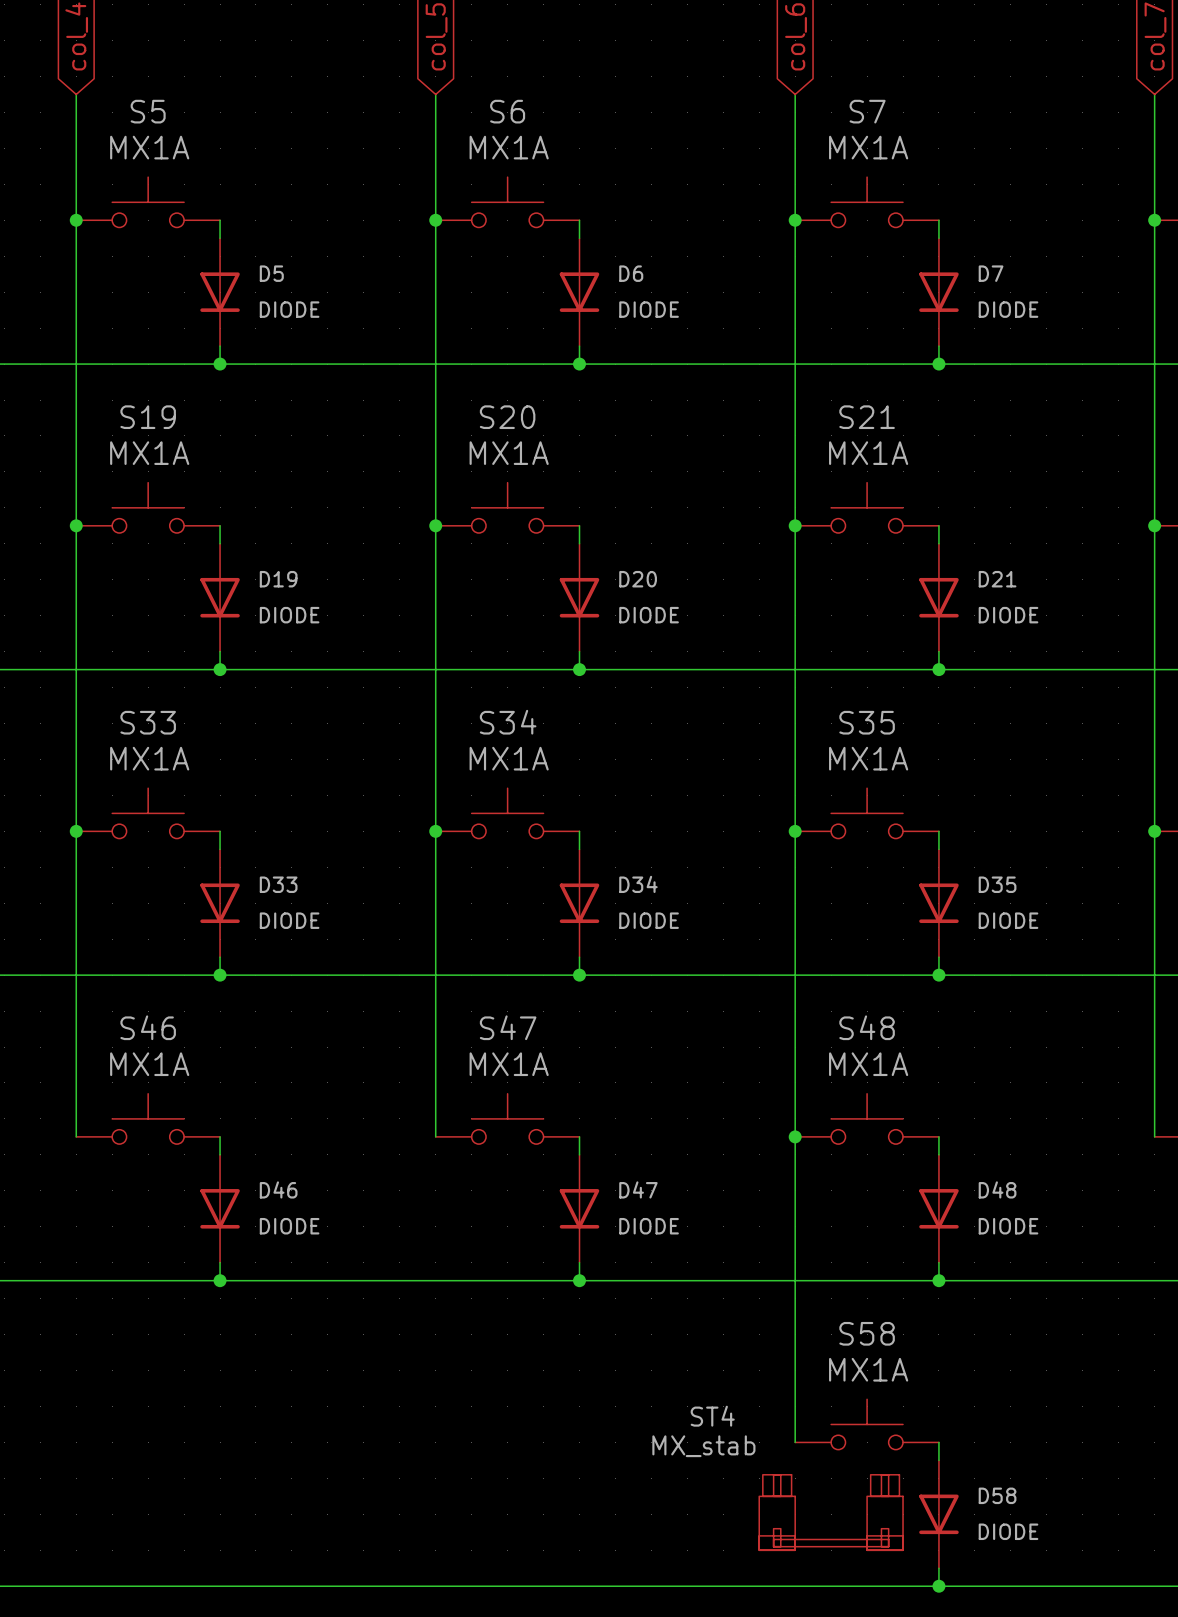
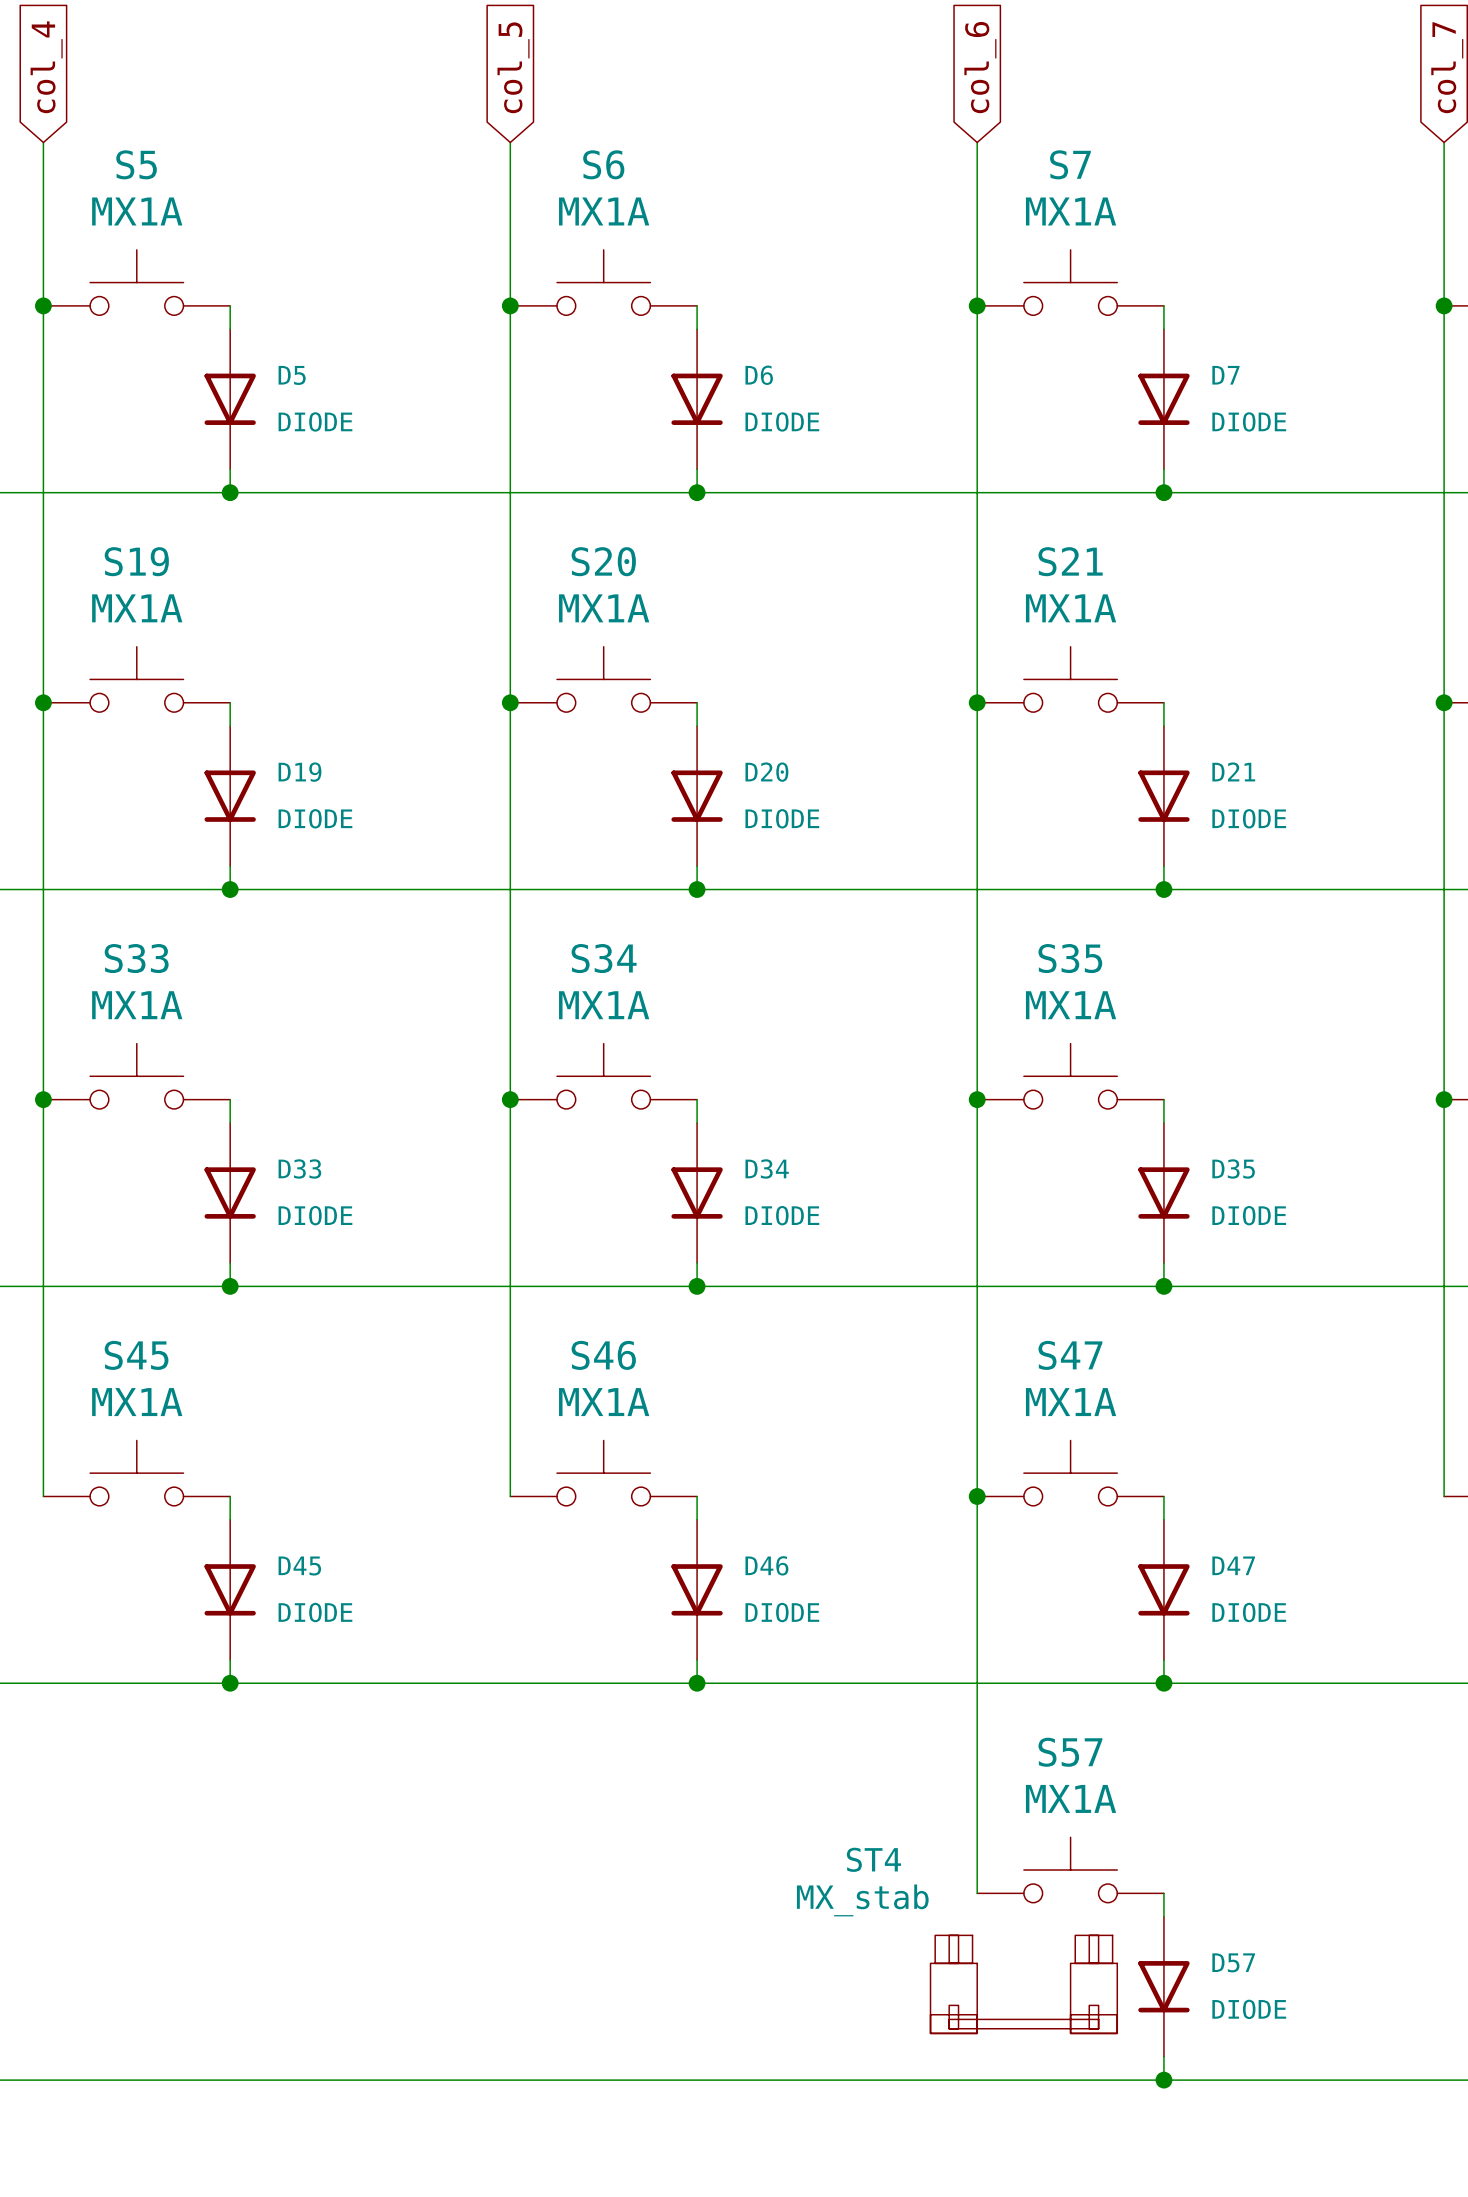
S46 name: S46 (148, 1027) -> S45 (136, 1355)
S47 name: S47 (508, 1027) -> S46 (603, 1355)
S48 name: S48 (867, 1027) -> S47 (1070, 1355)
D46 name: D46 (278, 1189) -> D45 (299, 1566)
D47 name: D47 (638, 1189) -> D46 (766, 1565)
D48 name: D48 (997, 1189) -> D47 (1233, 1565)
S58 name: S58 (867, 1333) -> S57 (1070, 1752)
D58 name: D58 (997, 1495) -> D57 (1233, 1962)

